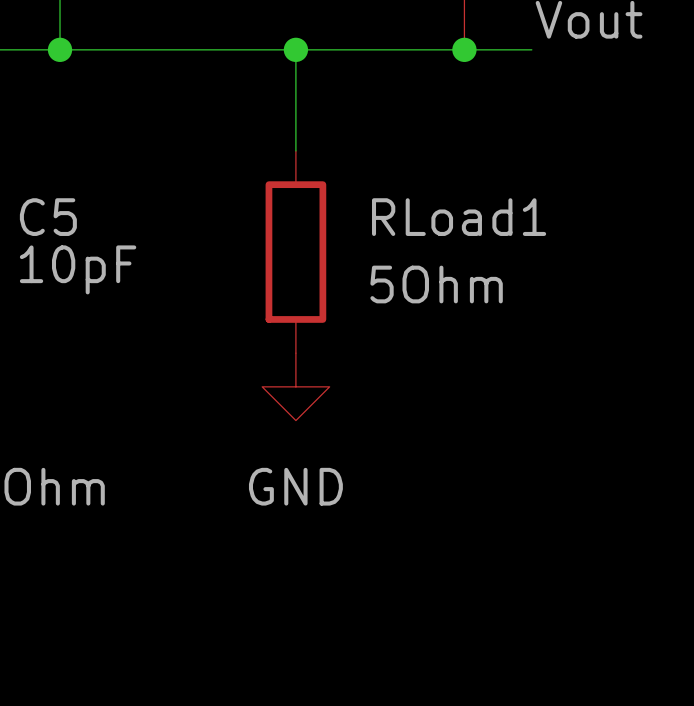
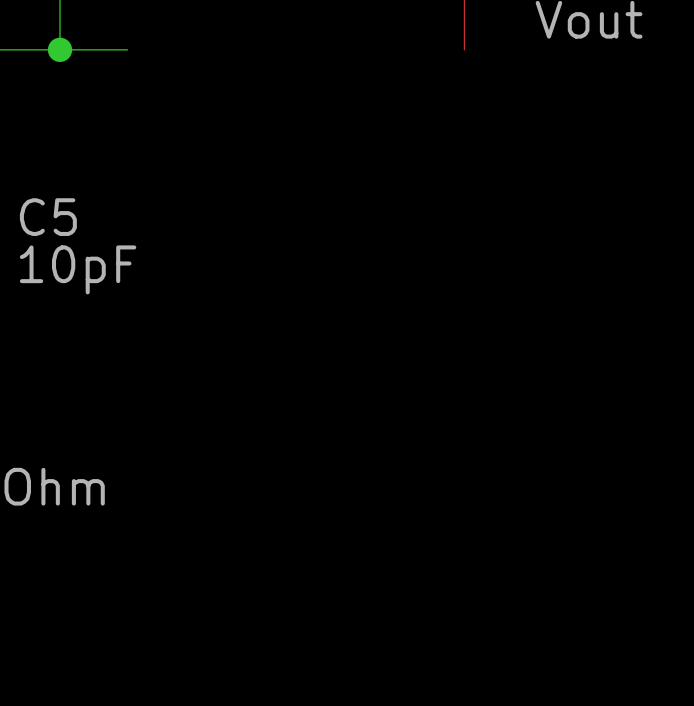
wire: (127, 49) (531, 49) -> none
wire: (295, 49) (295, 150) -> none
junction: (295, 49) -> none
junction: (464, 49) -> none
RLoad1: 5Ohm (295, 252) -> none
power symbol: GND (295, 386) -> none

